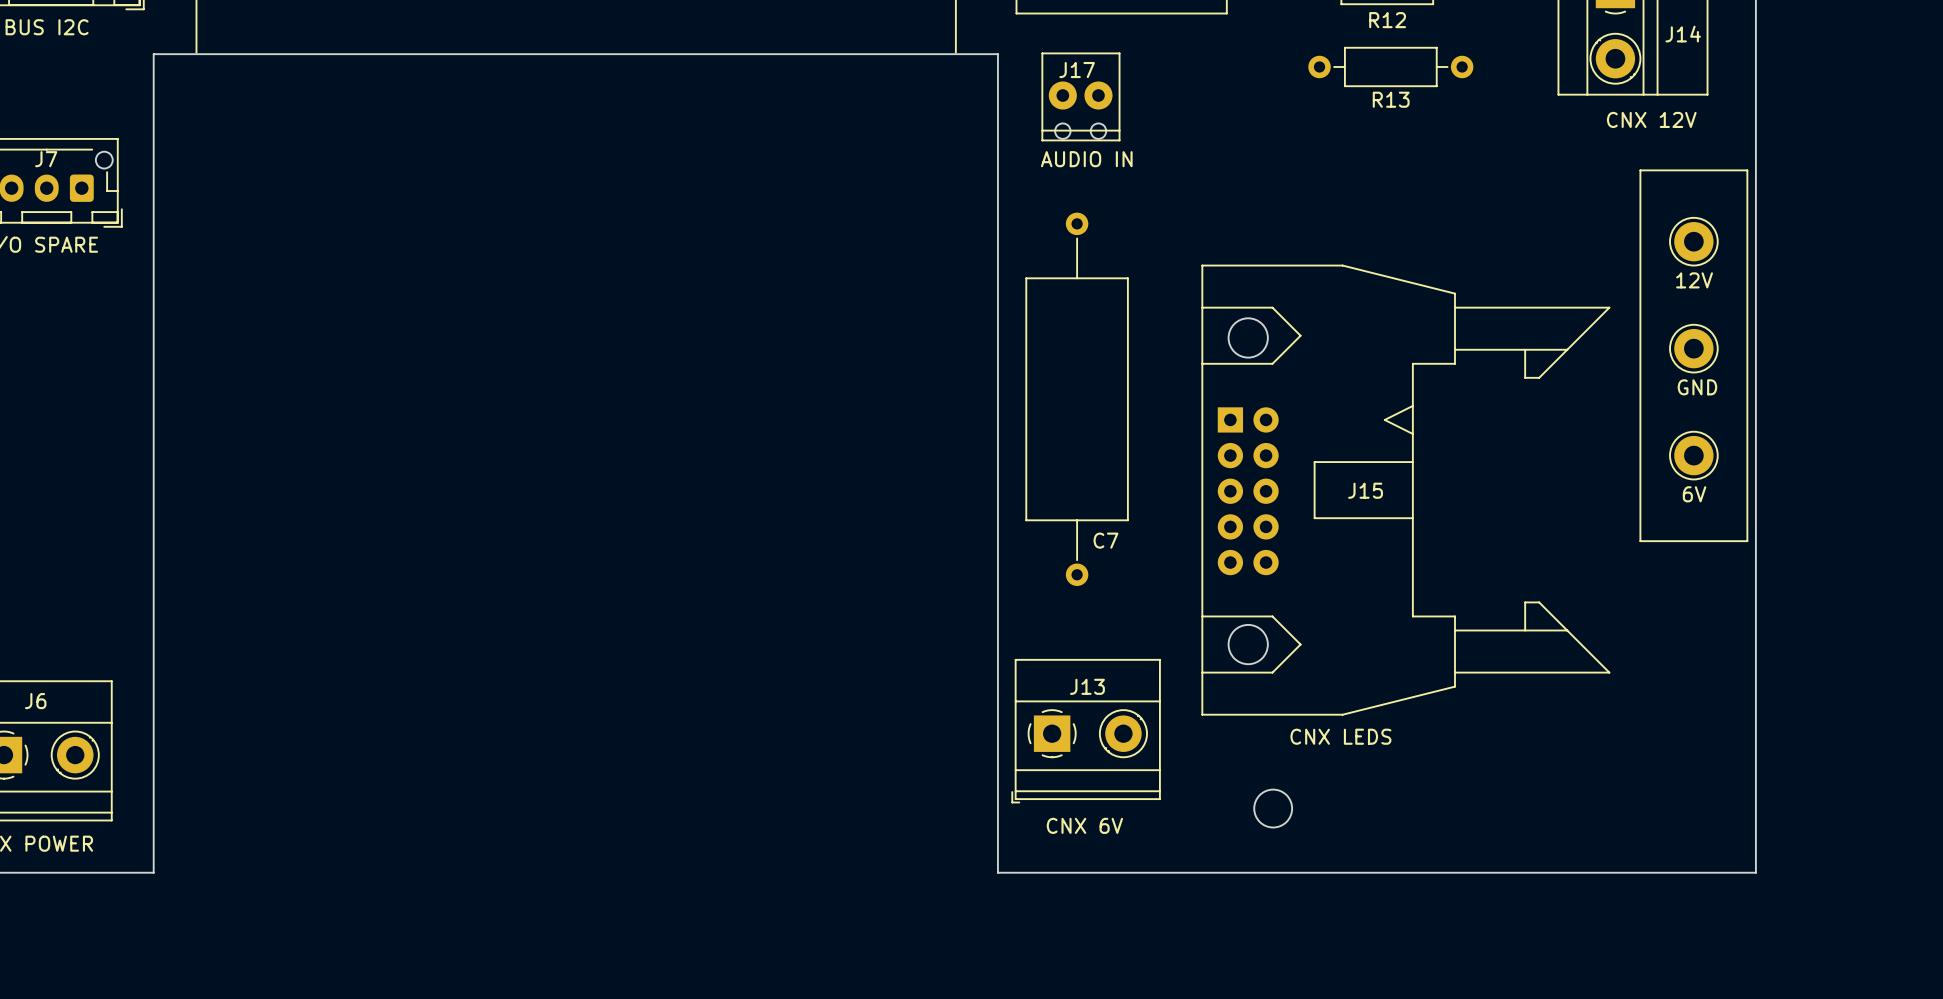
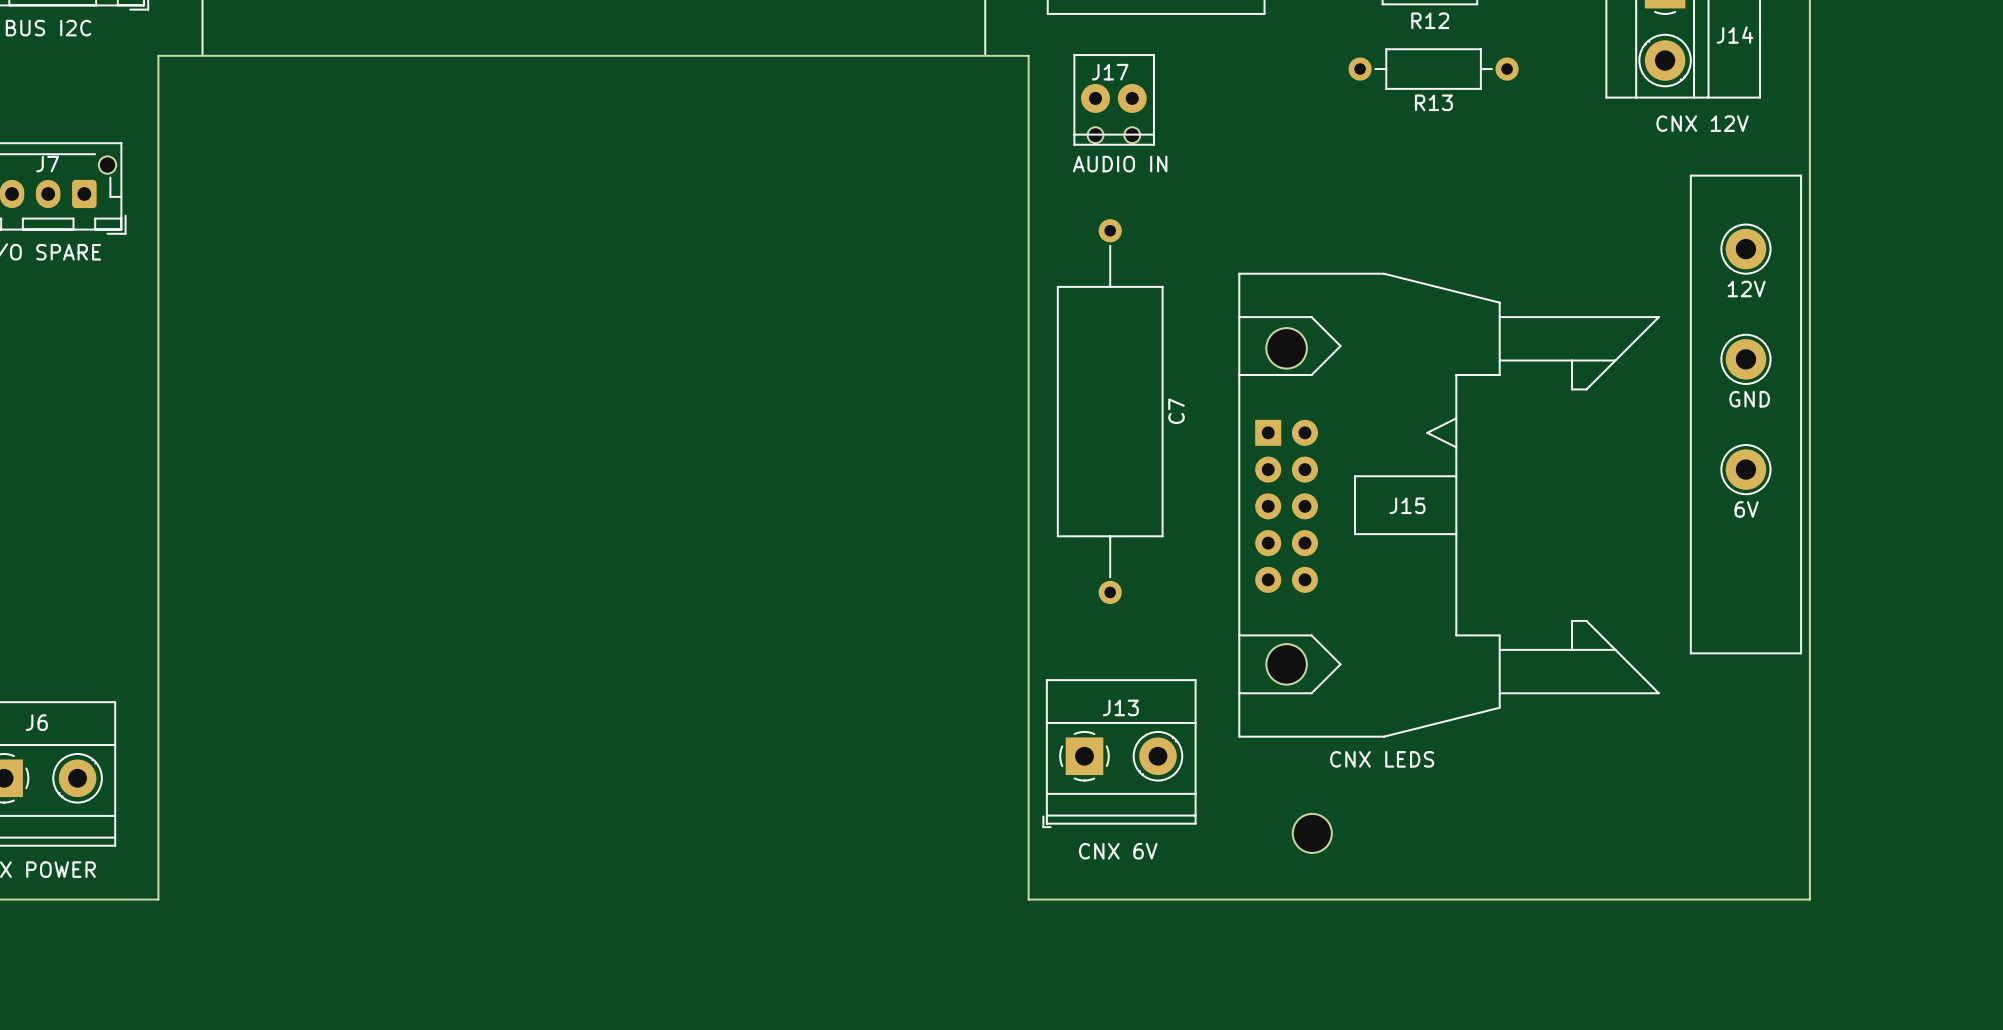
C7 name rotation: 0° (1105, 540) -> 90° counterclockwise (1176, 411)
C7 name position: C7 (1105, 540) -> C7 (1176, 411)
line: (1640, 541) (1747, 541) -> (1690, 557) (1690, 653) (1801, 653) (1801, 557)

